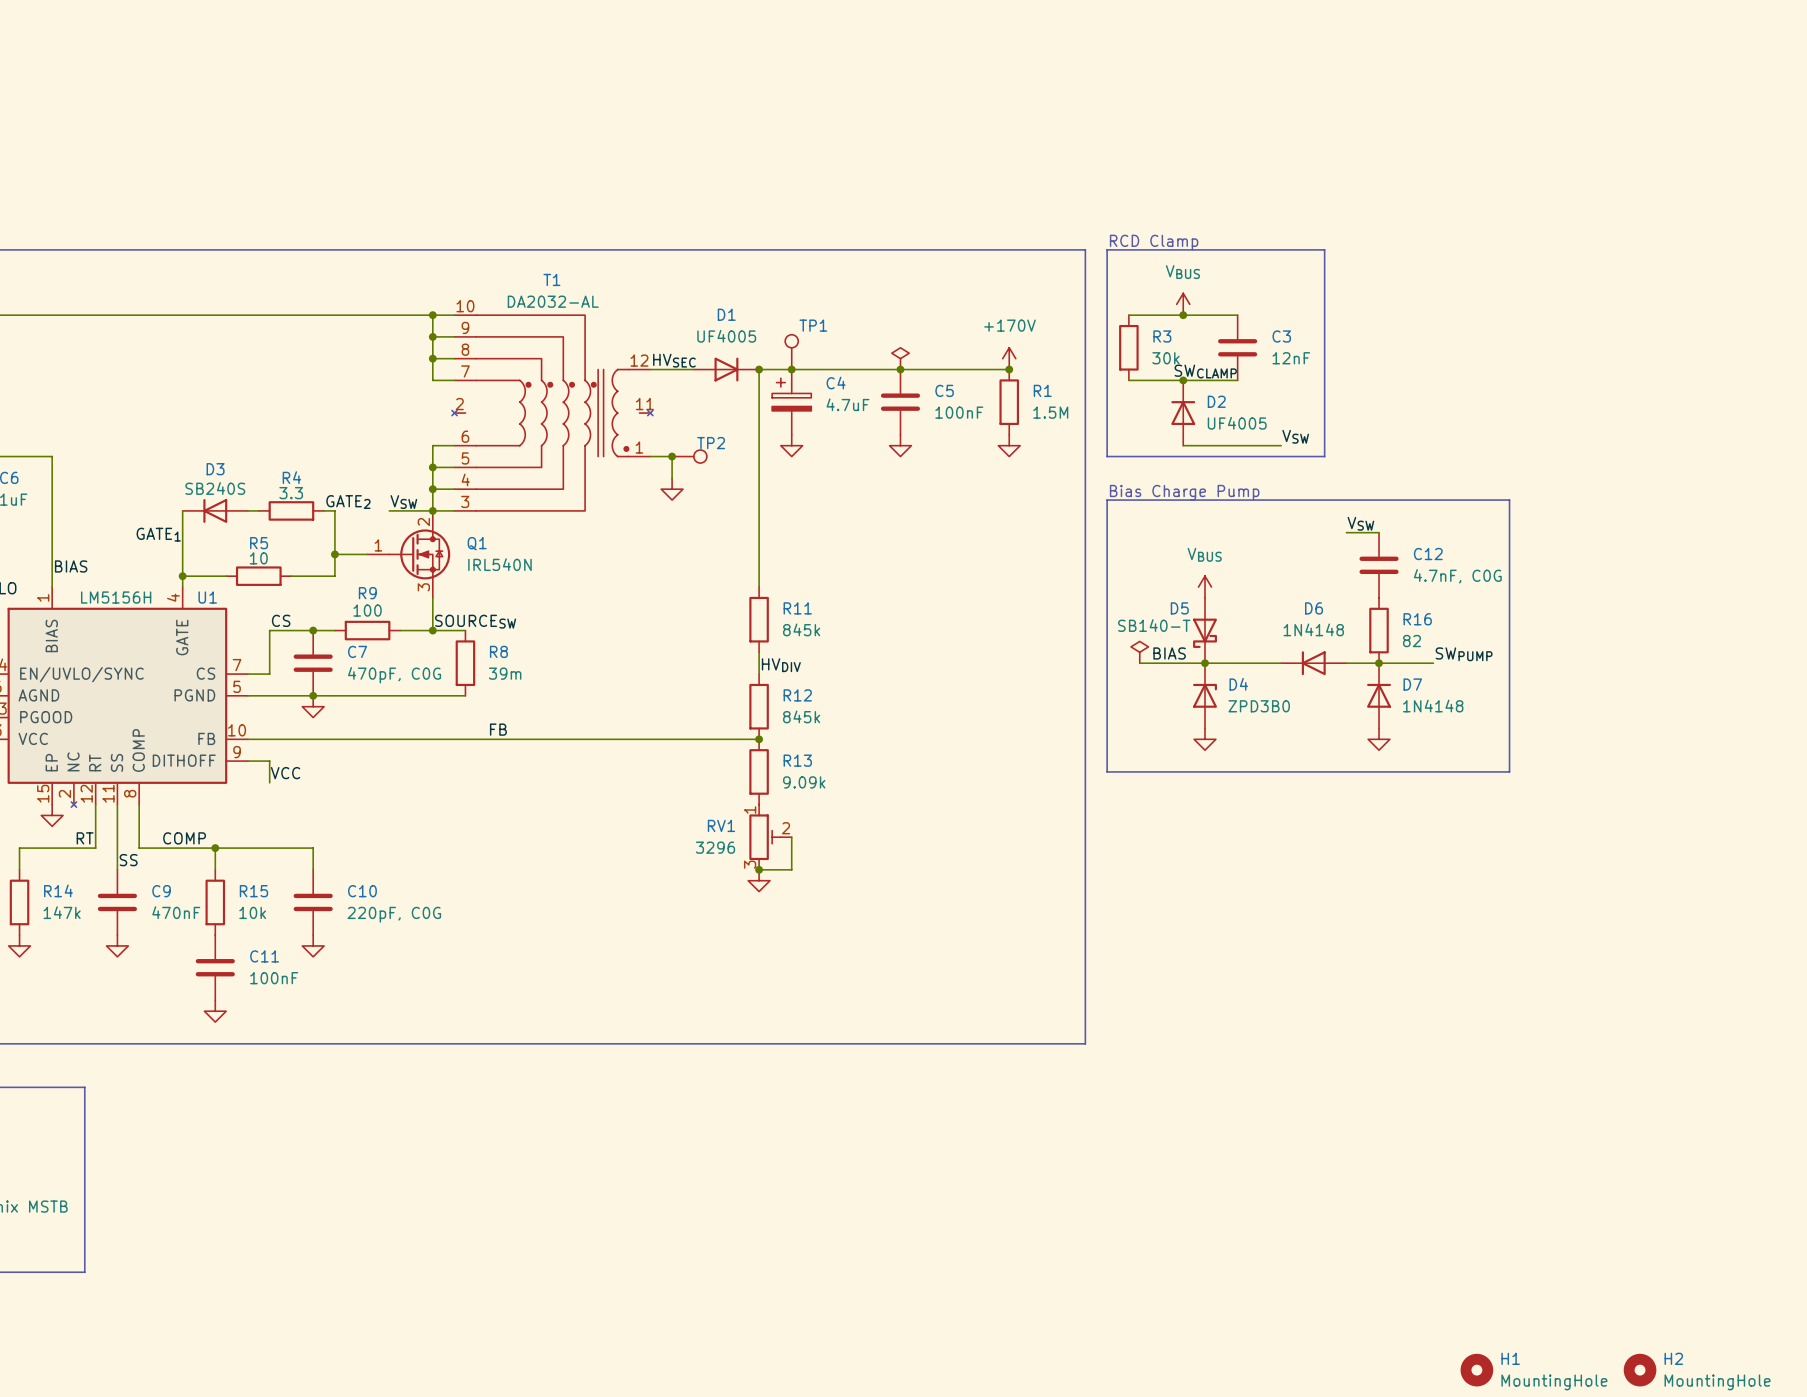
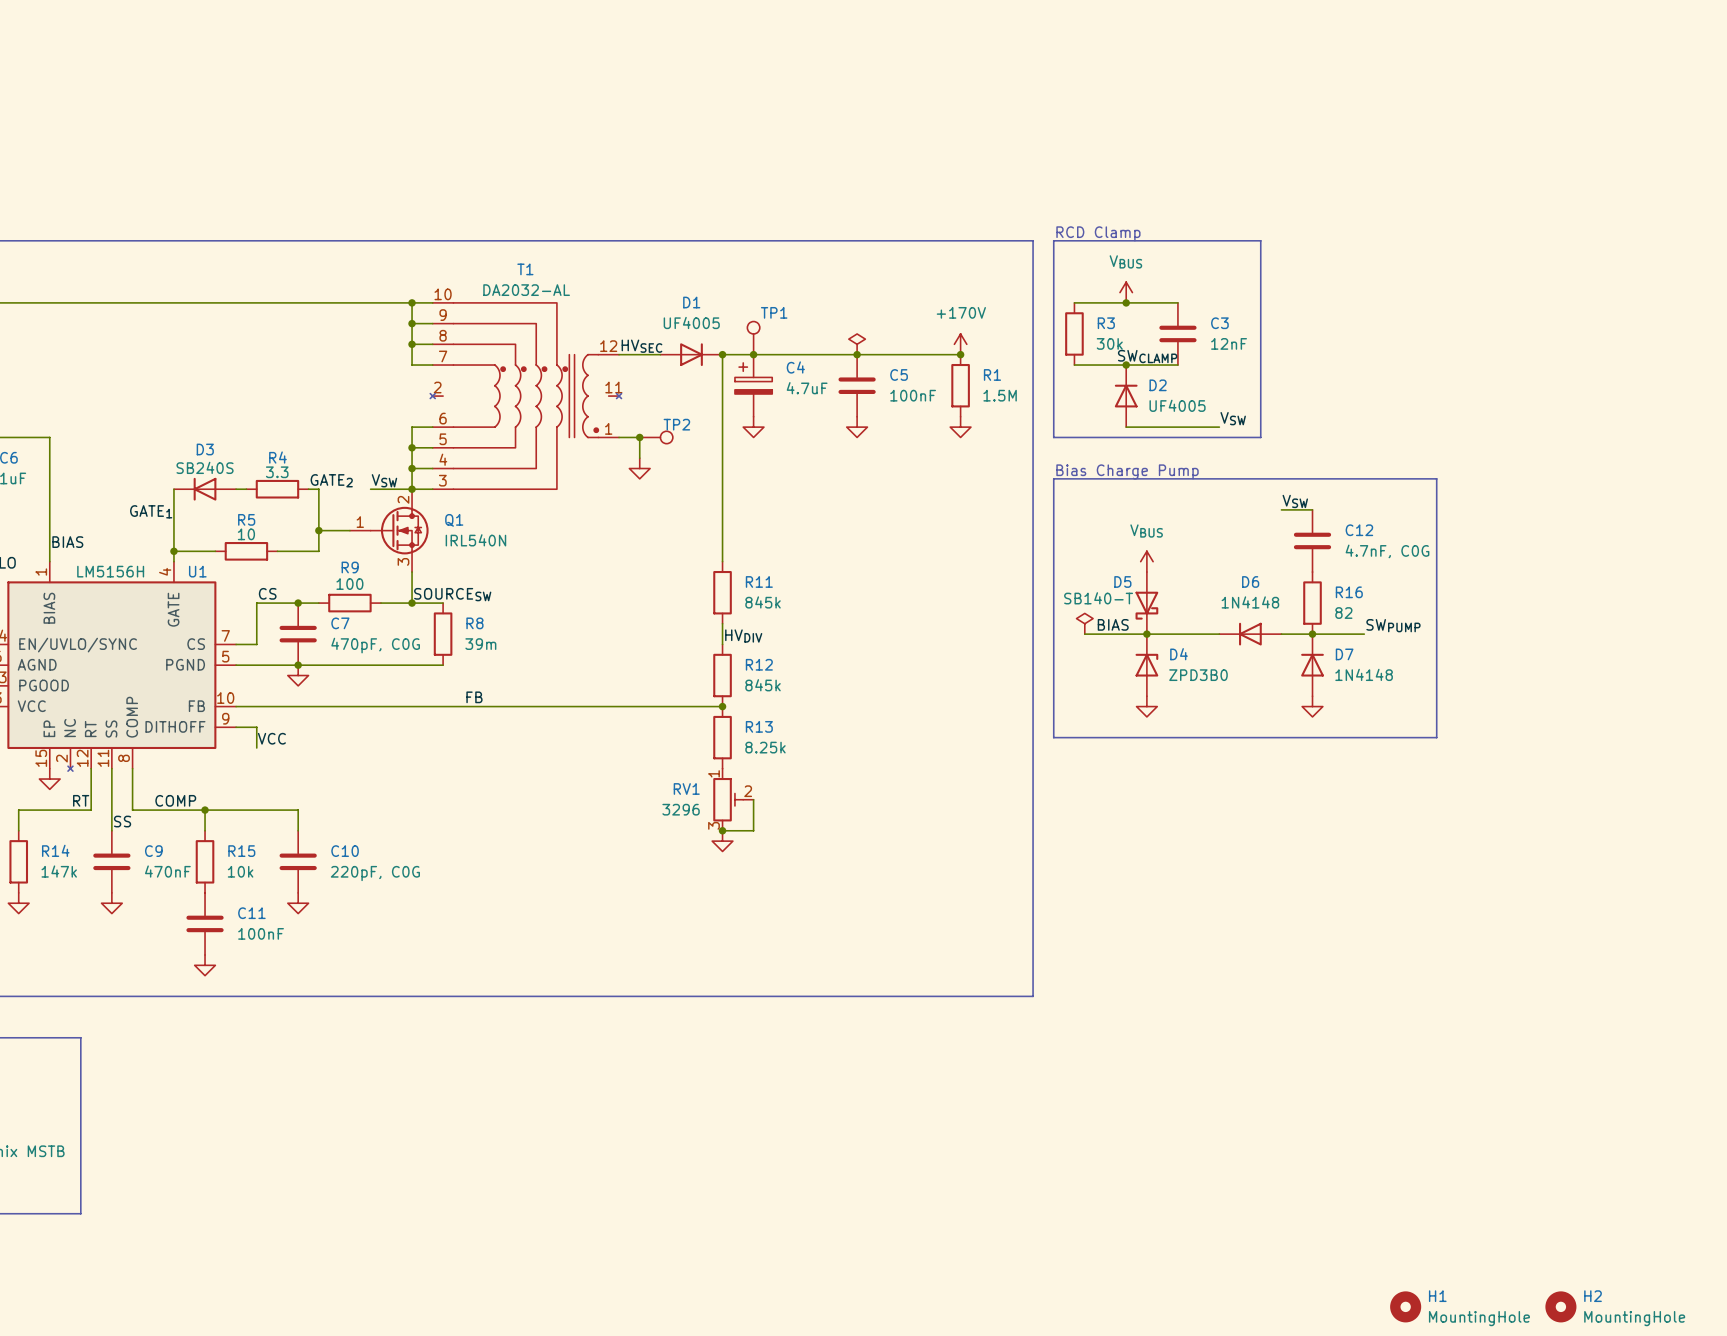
R13 value: 9.09k (804, 782) -> 8.25k (765, 747)

